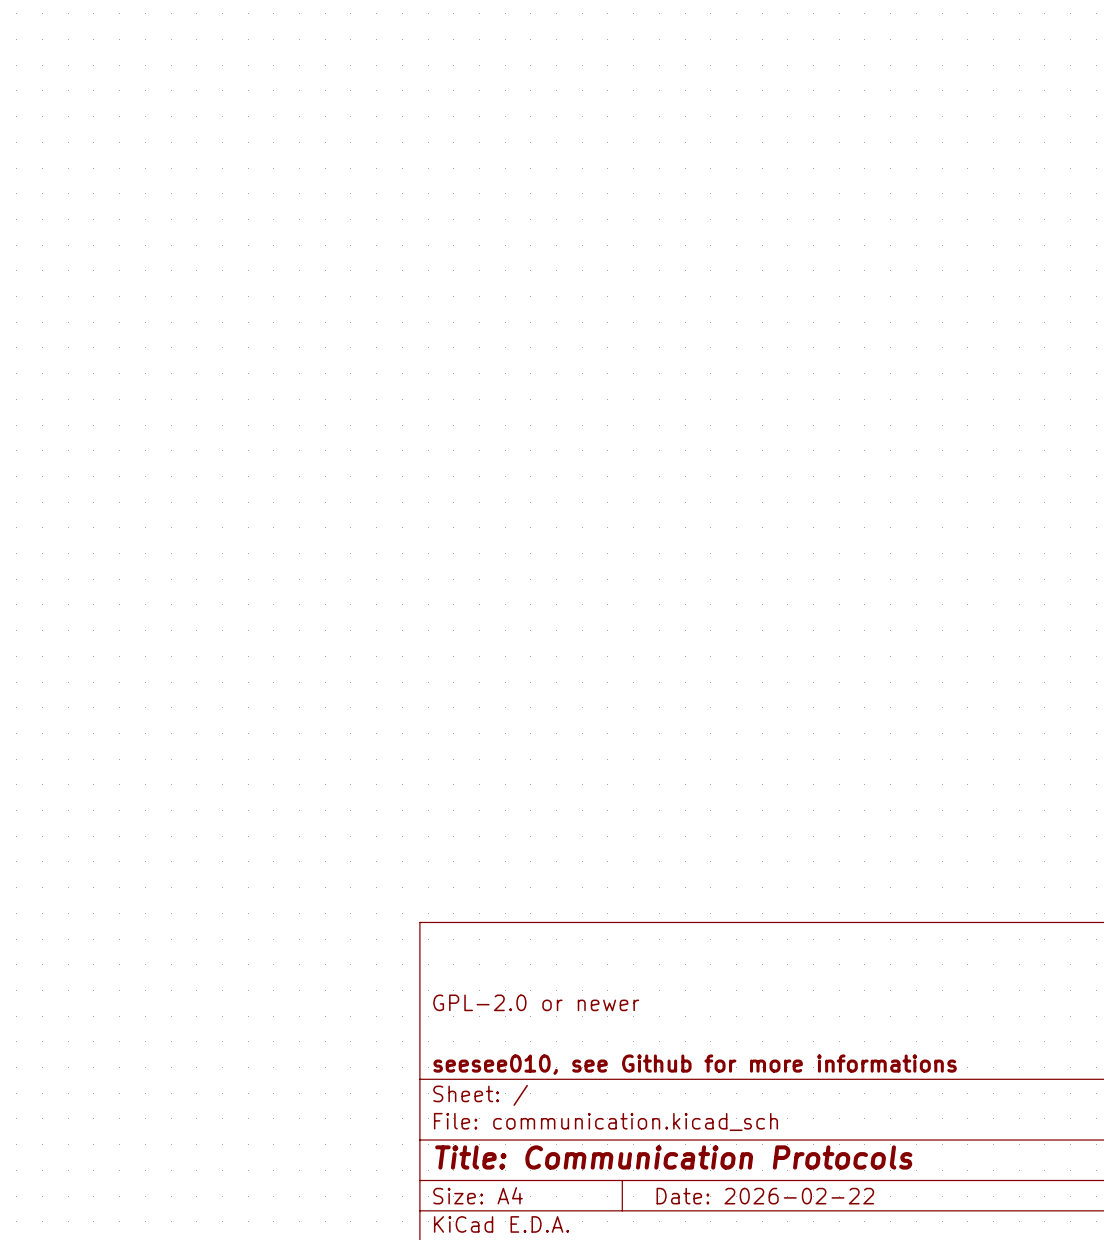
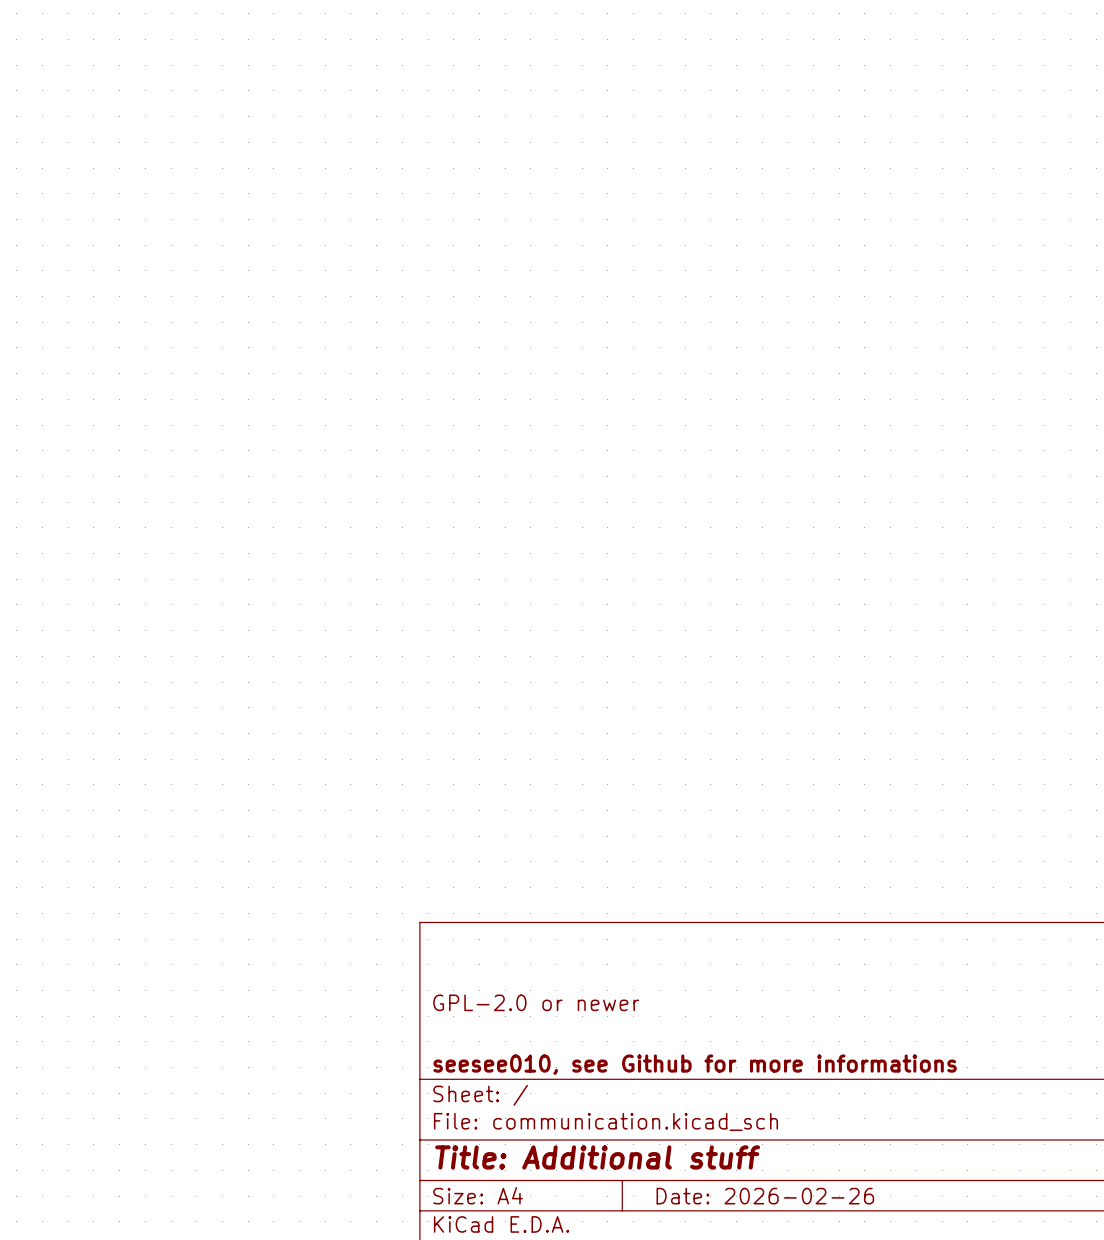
title block: Title: Communication Protocols (673, 1157) -> Title: Additional stuff (597, 1157)
title block: Date: 2026-02-22 (765, 1196) -> Date: 2026-02-26 (765, 1196)

